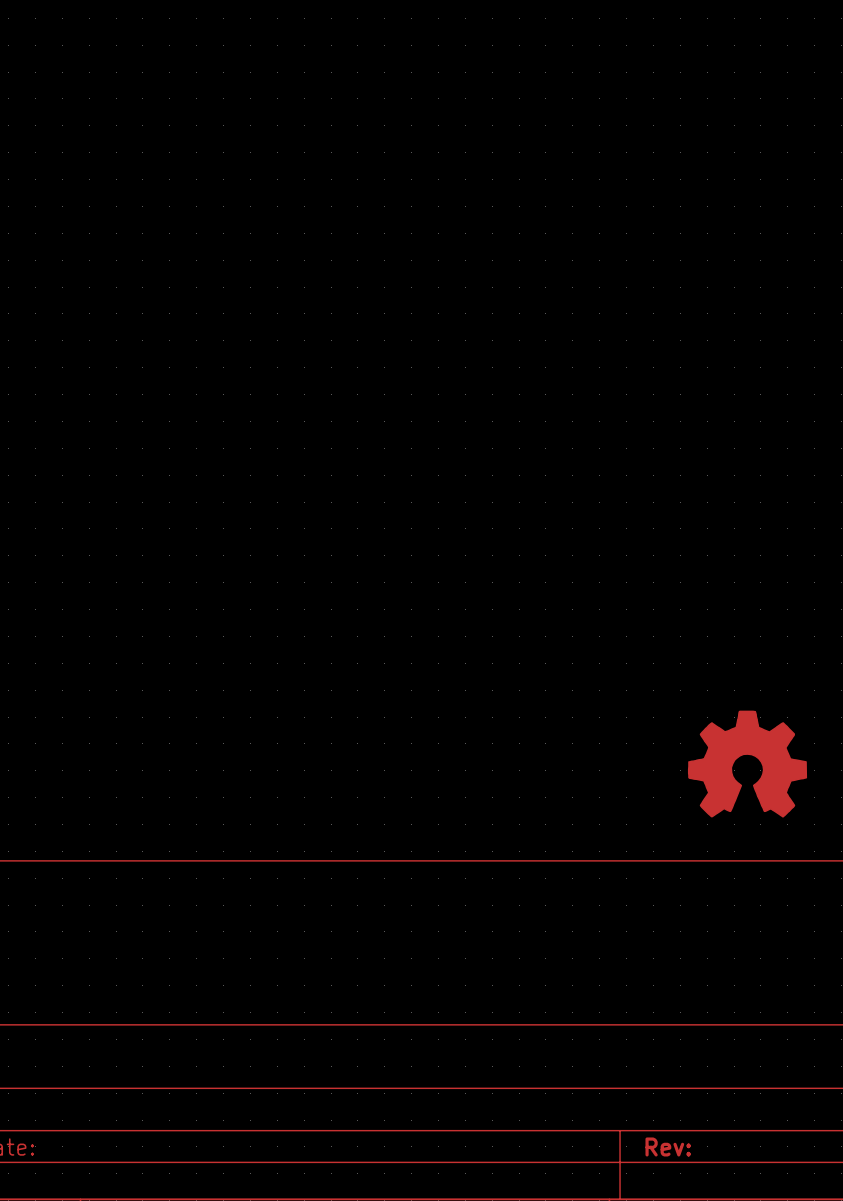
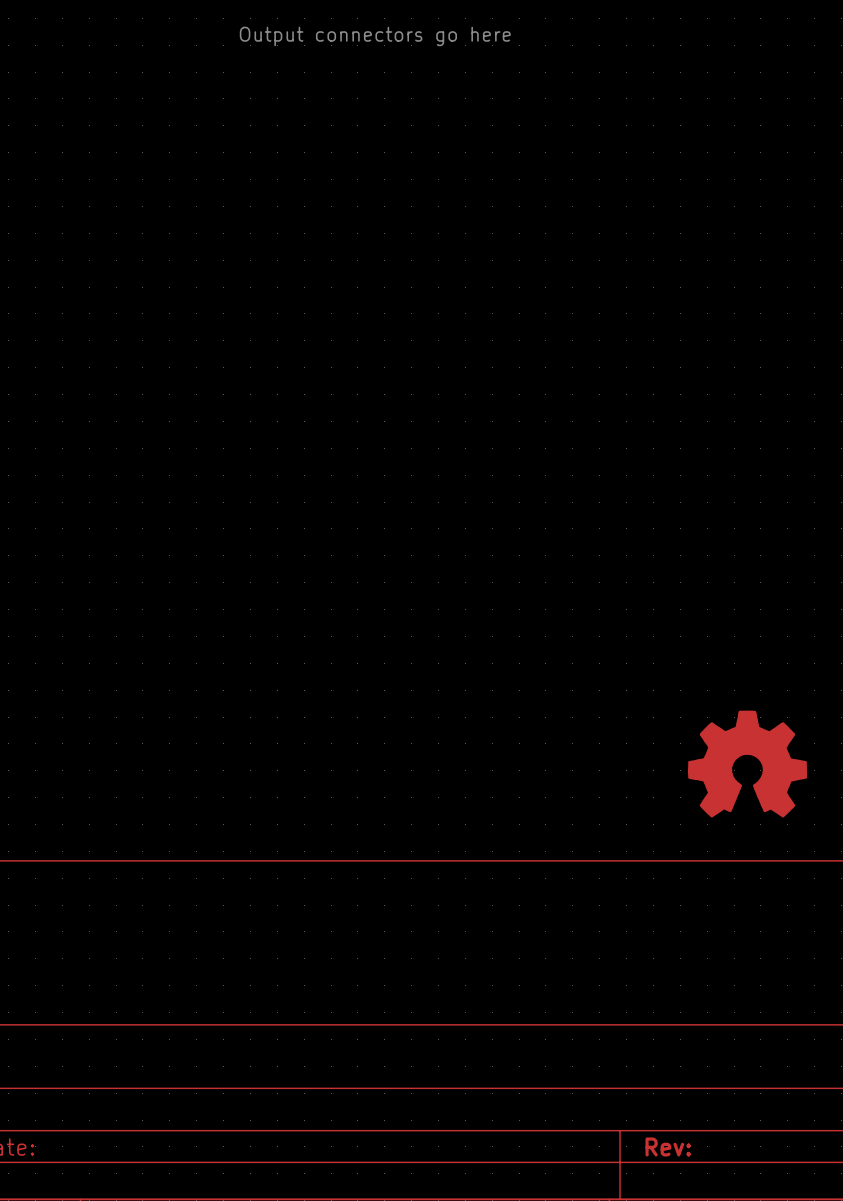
text: none -> Output connectors go here (375, 36)

